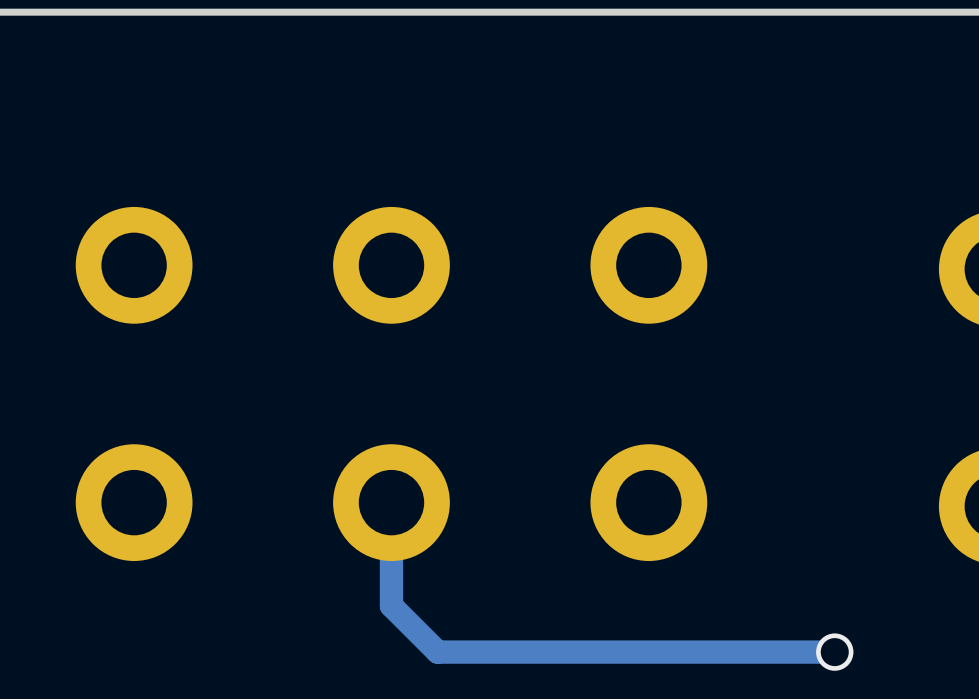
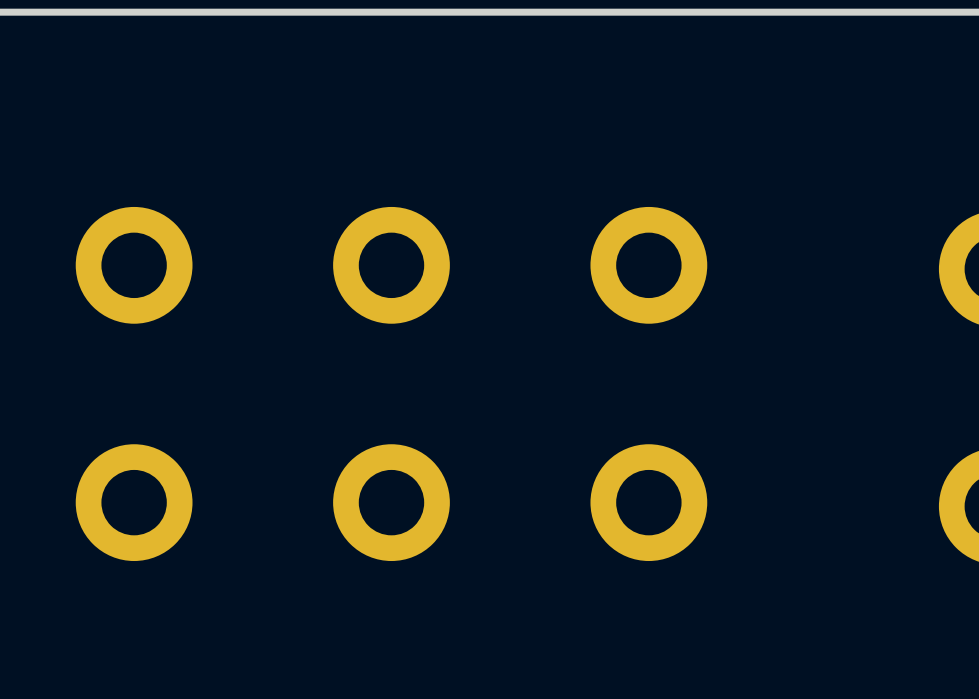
track: (391, 502) (391, 605) (437, 652) (834, 652) -> none
via: (834, 652) -> none

